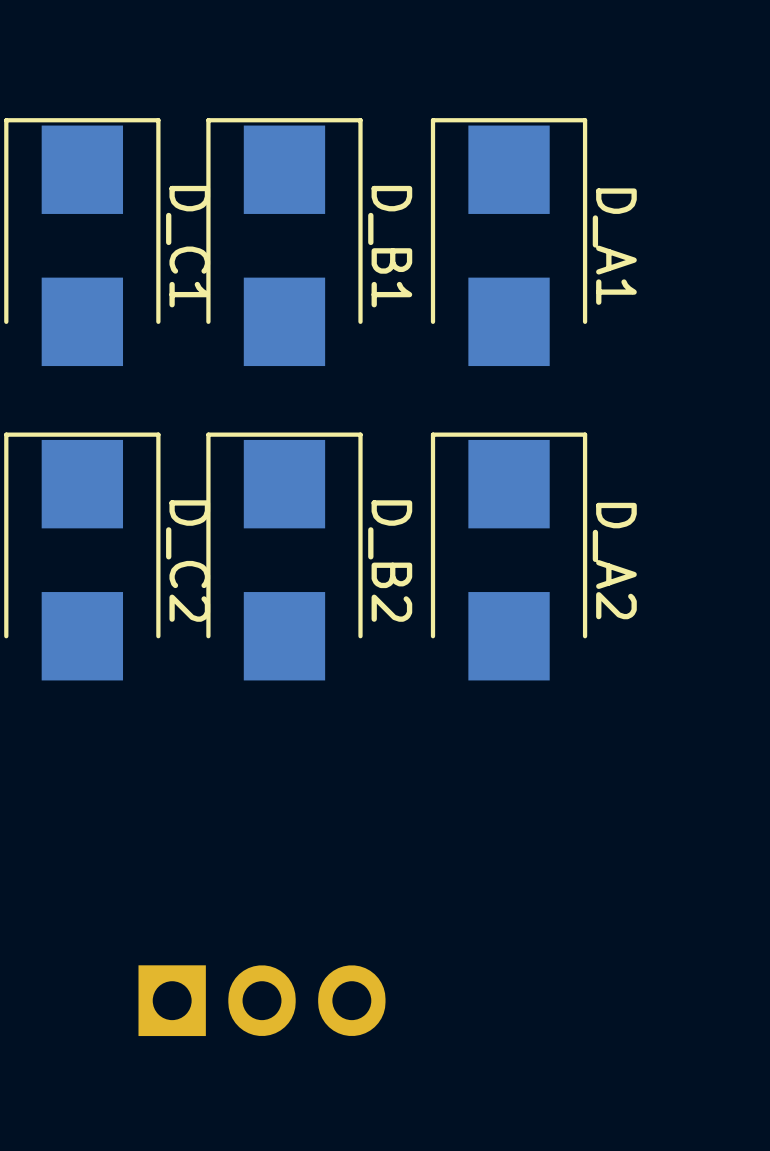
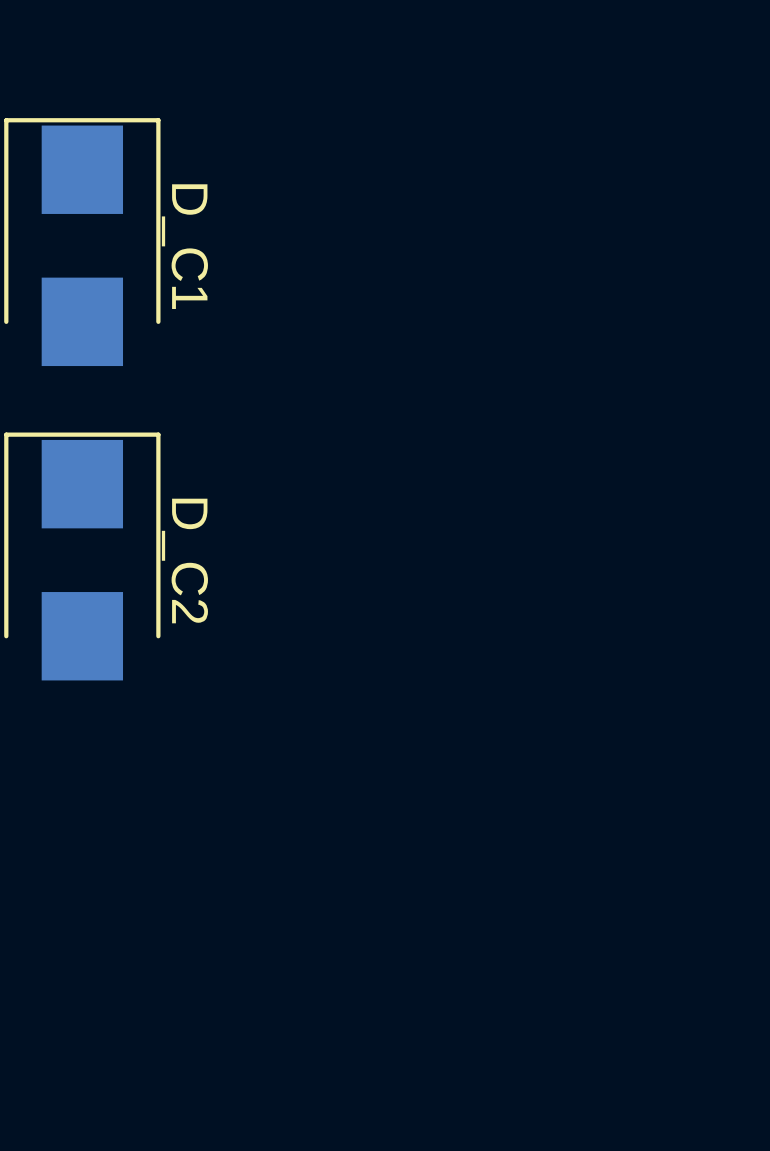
D_B1: (284, 242) -> none
D_A1: (509, 242) -> none
D_B2: (284, 556) -> none
D_A2: (509, 556) -> none
part: (262, 1000) -> none

